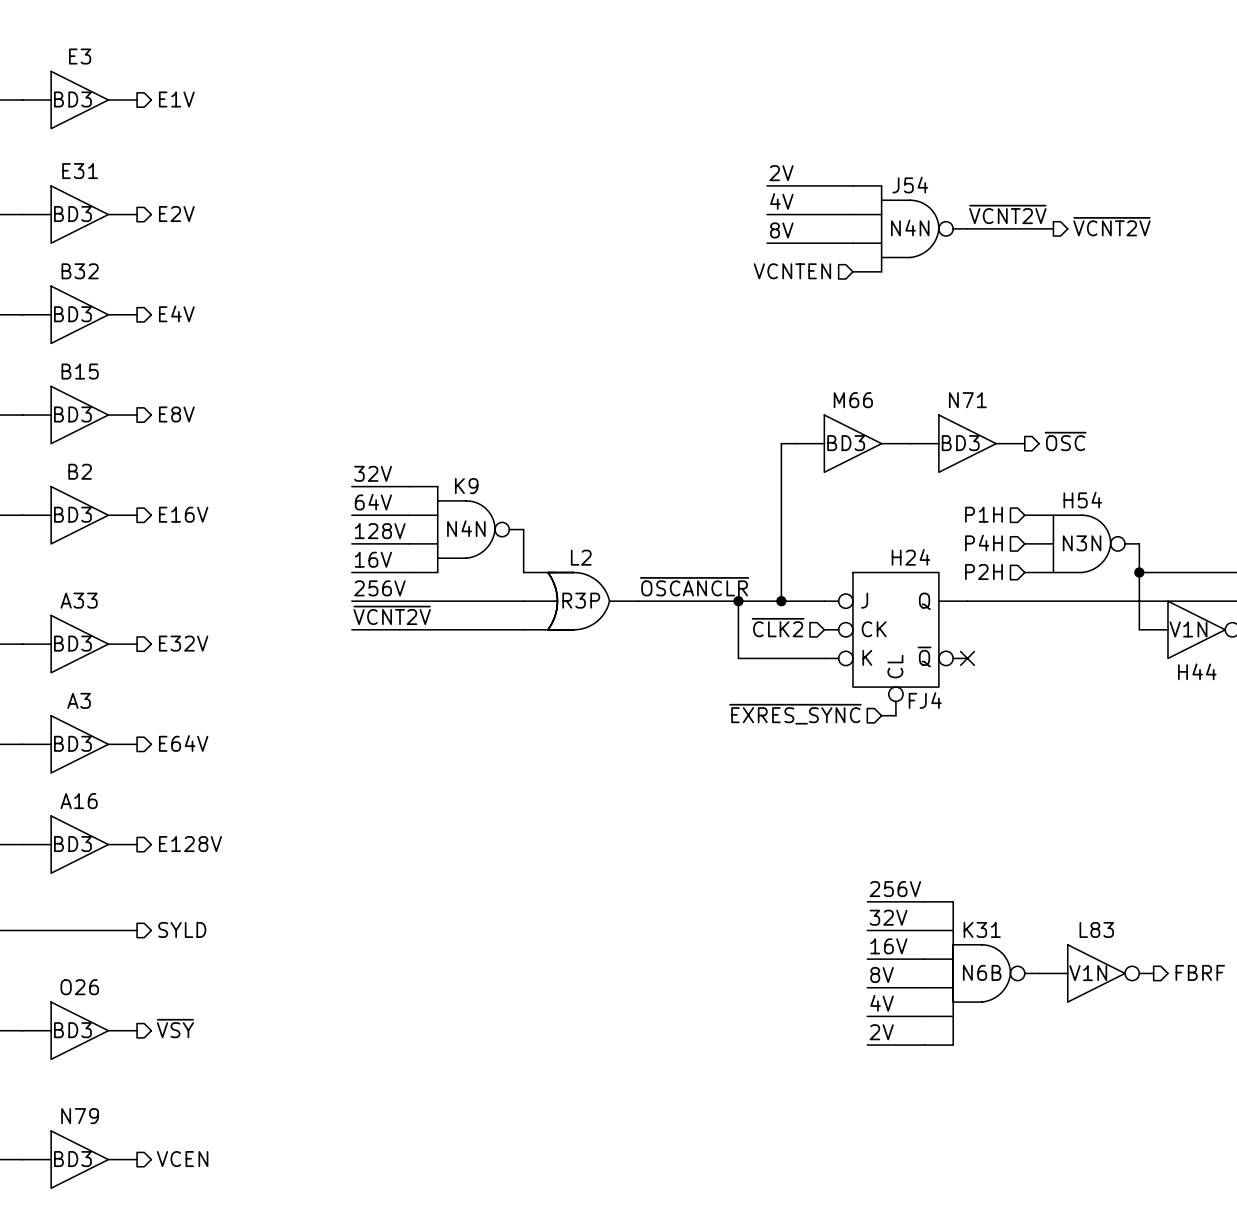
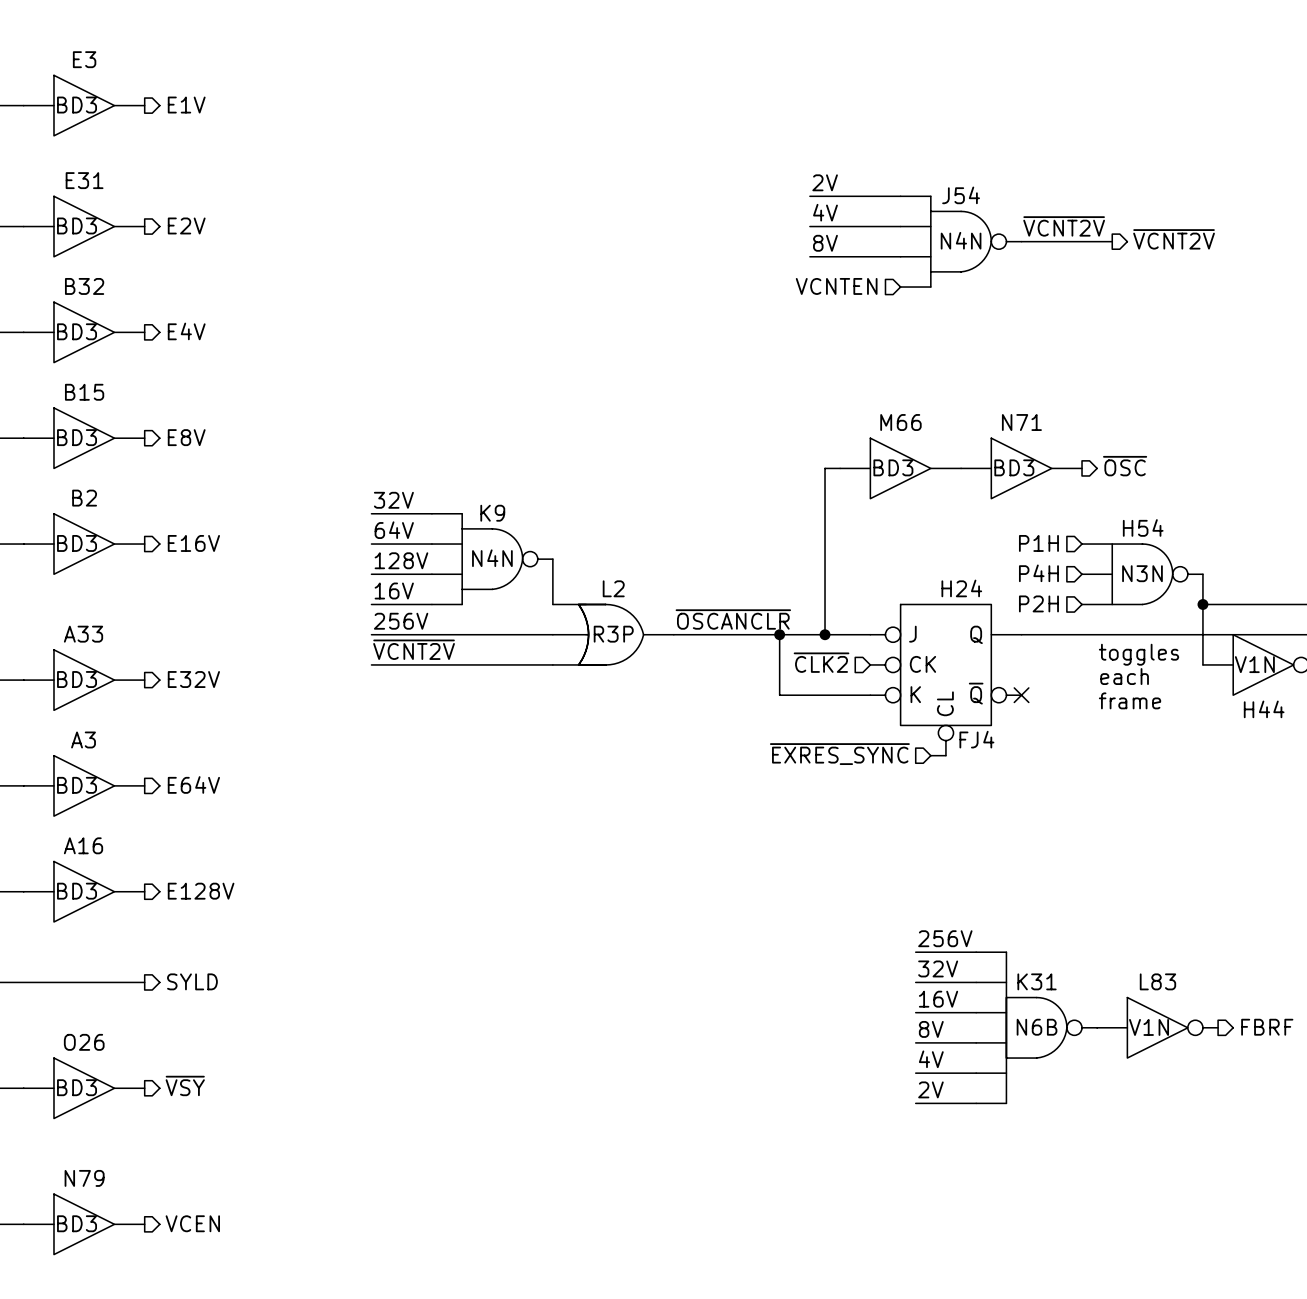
text: none -> toggles (1139, 654)
text: none -> each (1124, 676)
text: none -> frame (1130, 700)

